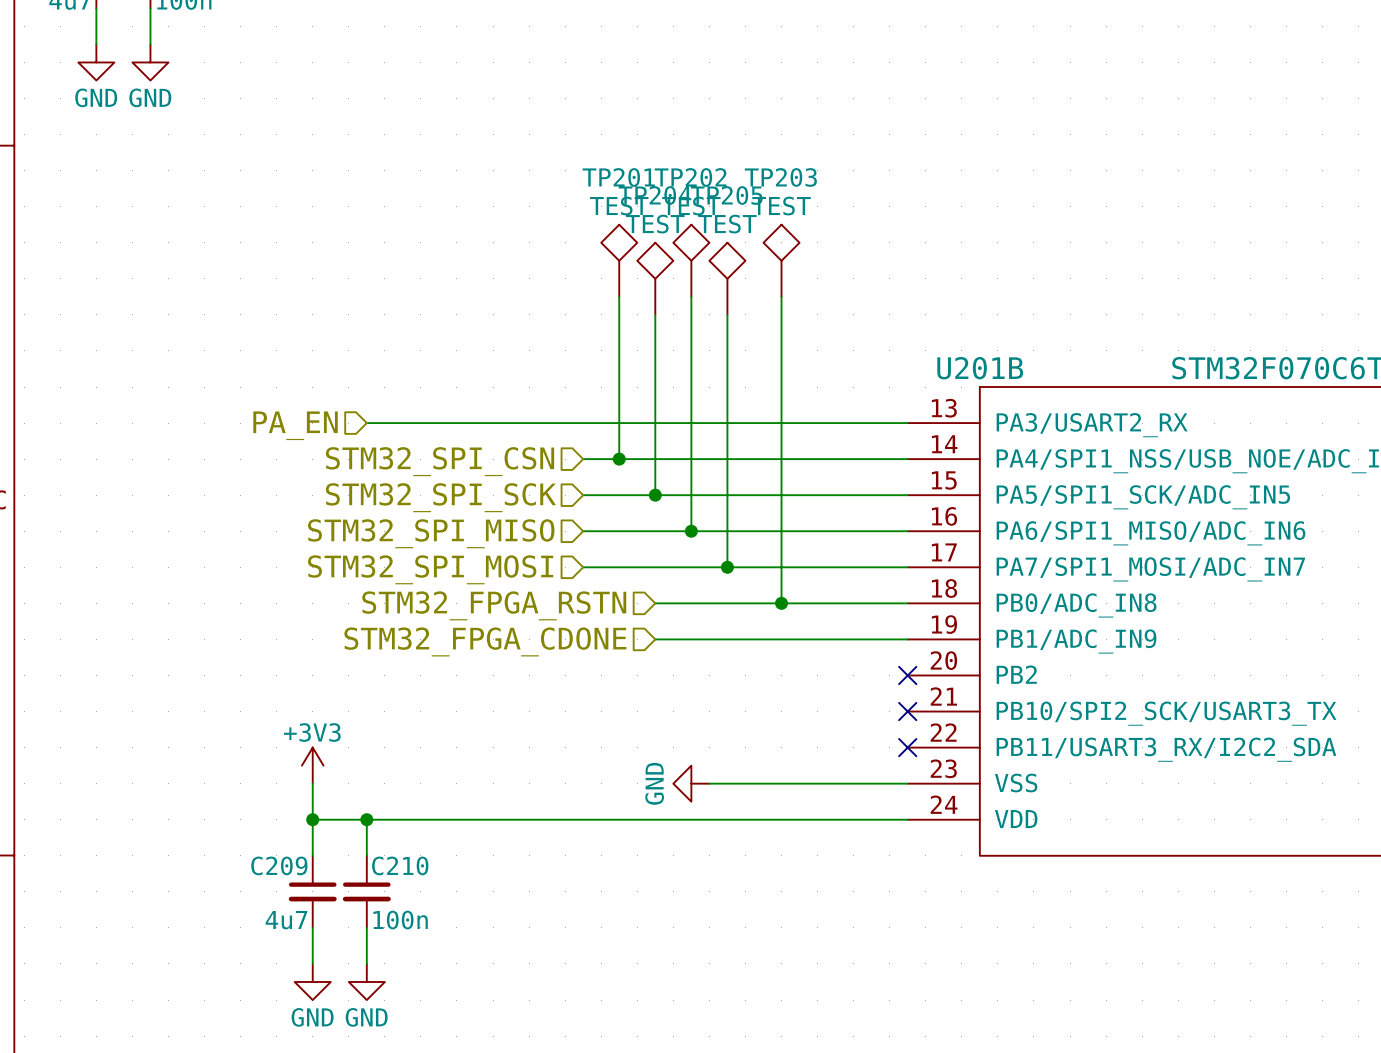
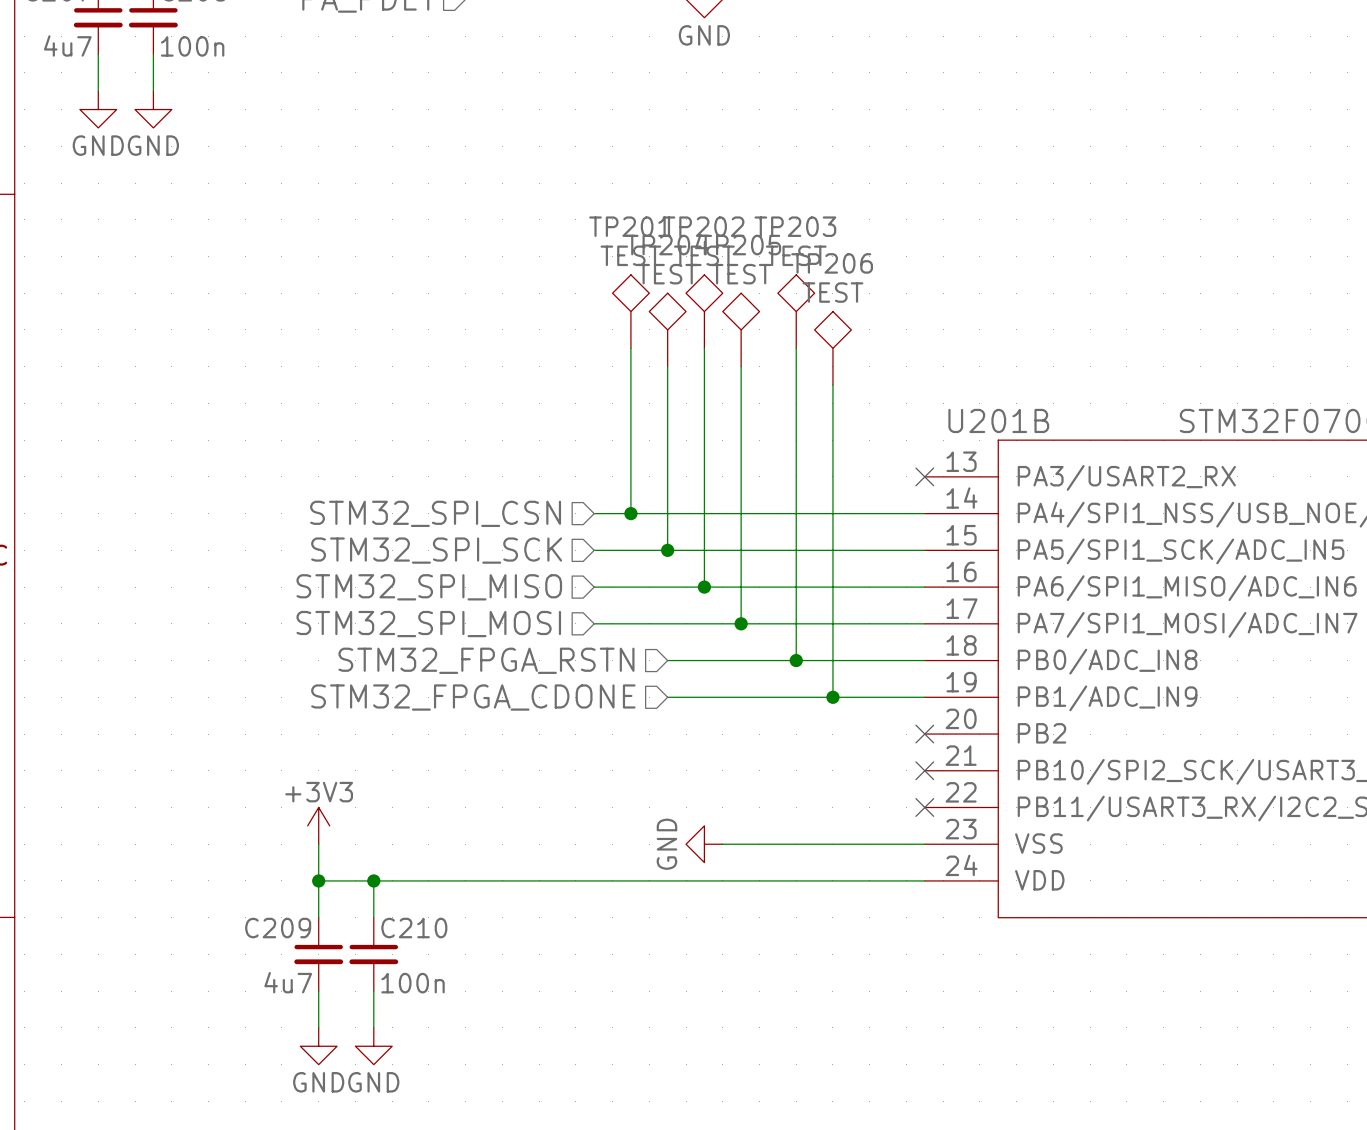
TP206: none -> TEST (832, 348)
wire: none -> (832, 385) (832, 697)
wire: (366, 423) (907, 423) -> none
no-connect mark: none -> (924, 476)
hierarchical label: PA_EN (295, 425) -> none
junction: none -> (832, 697)

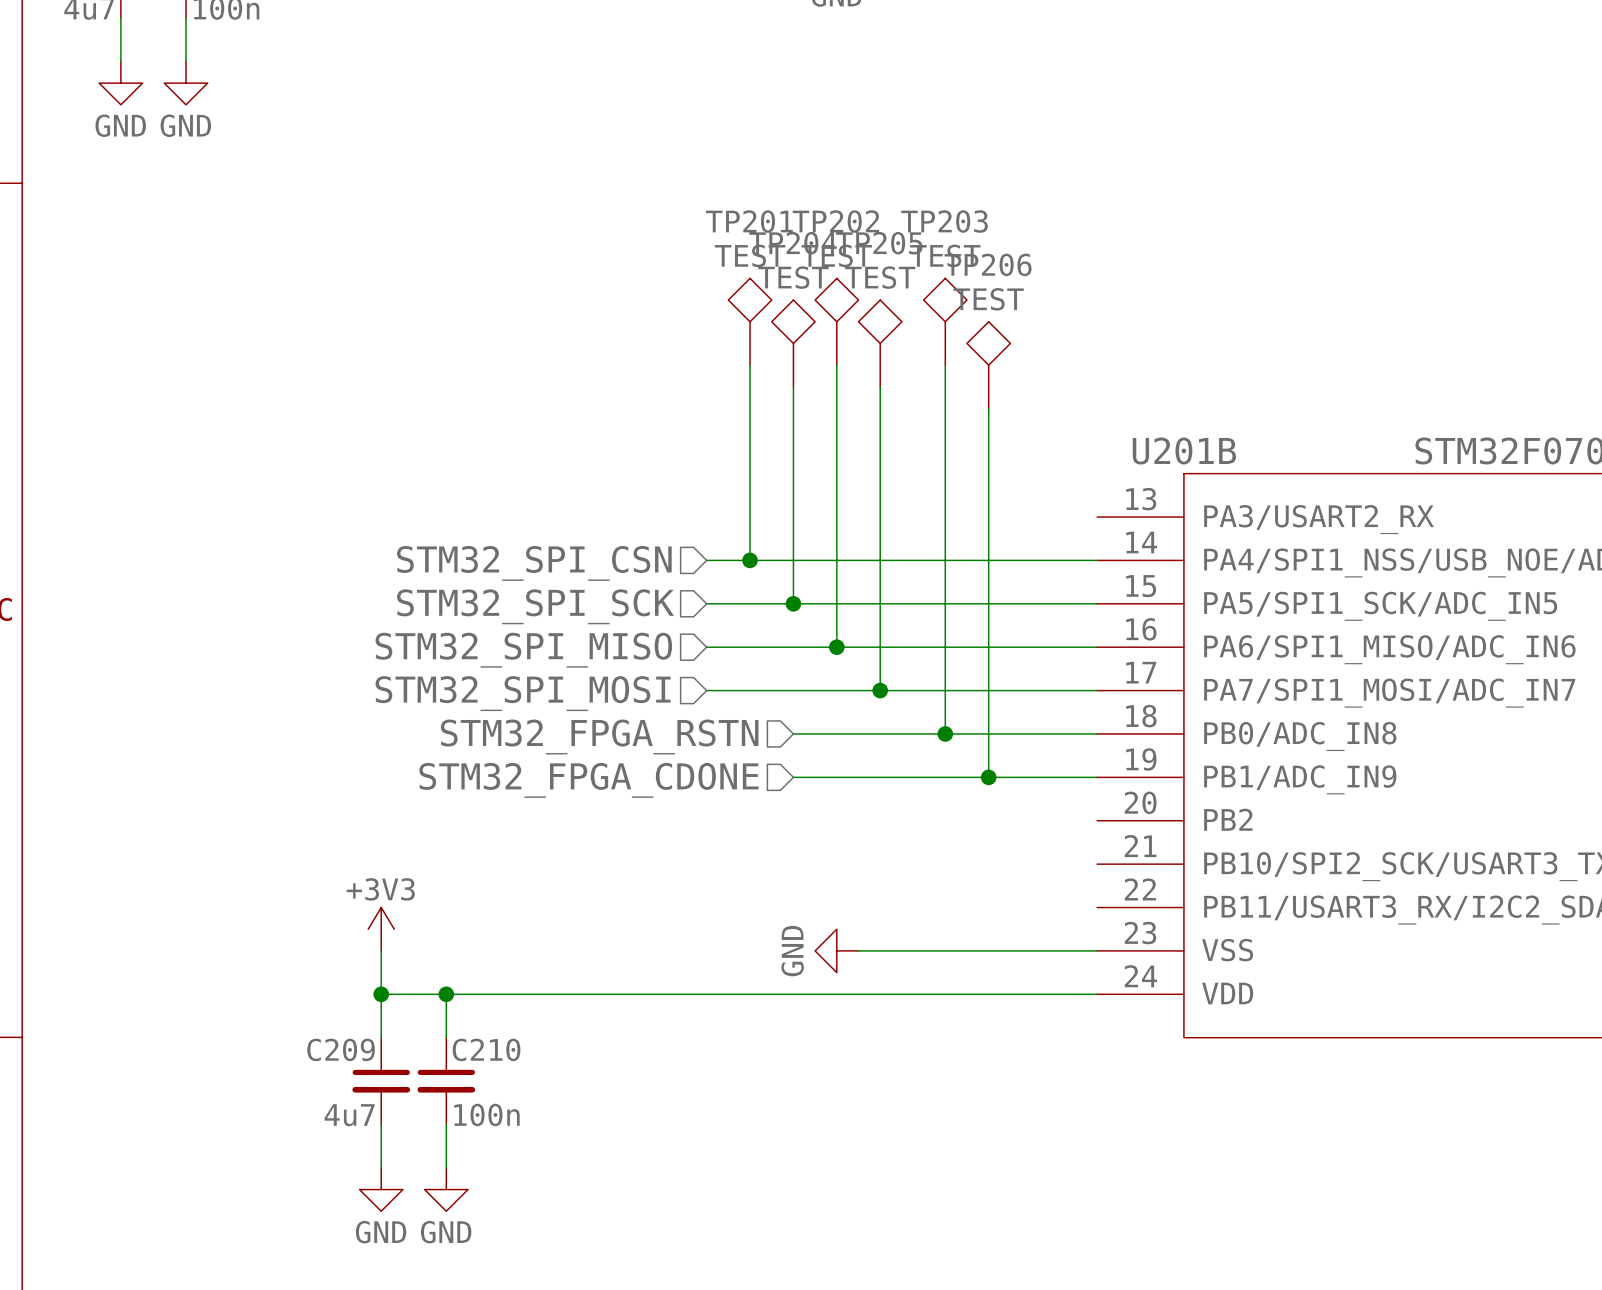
no-connect mark: (924, 476) -> none
no-connect mark: (924, 734) -> none
no-connect mark: (924, 770) -> none
no-connect mark: (924, 807) -> none

